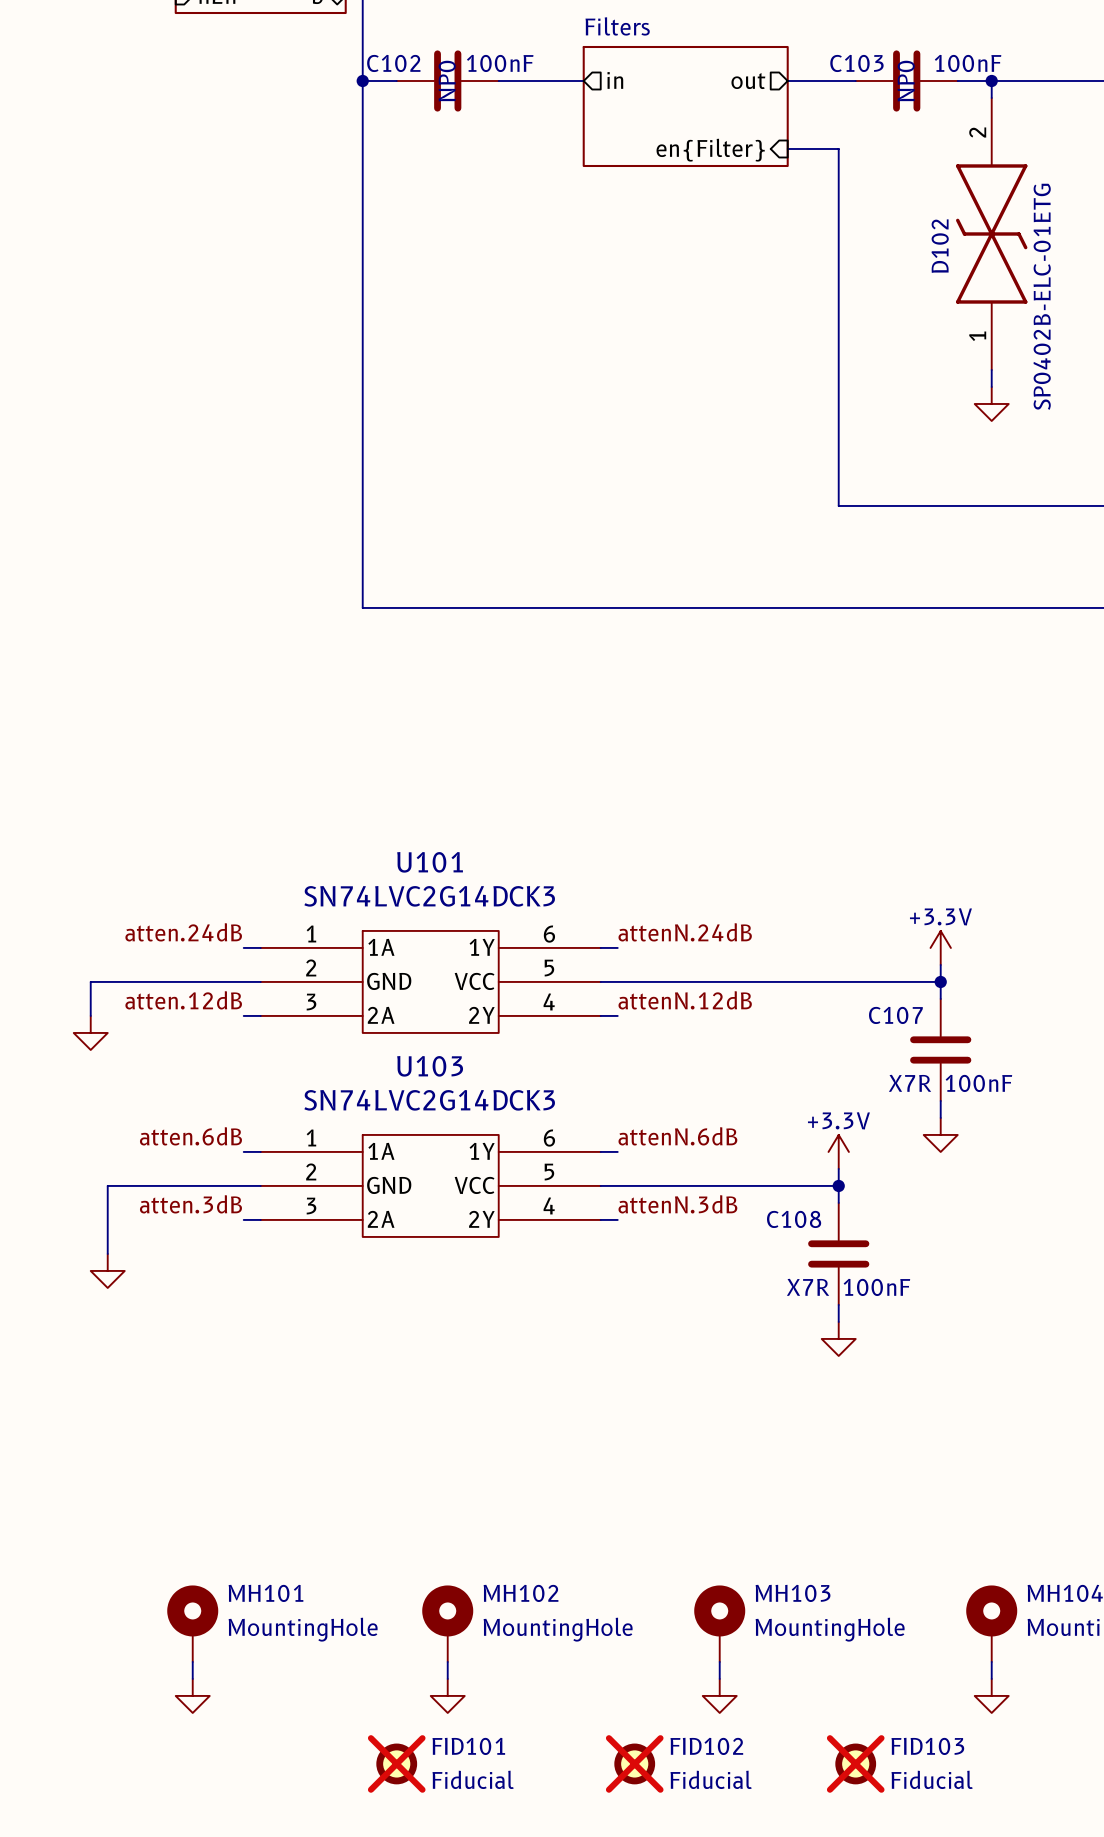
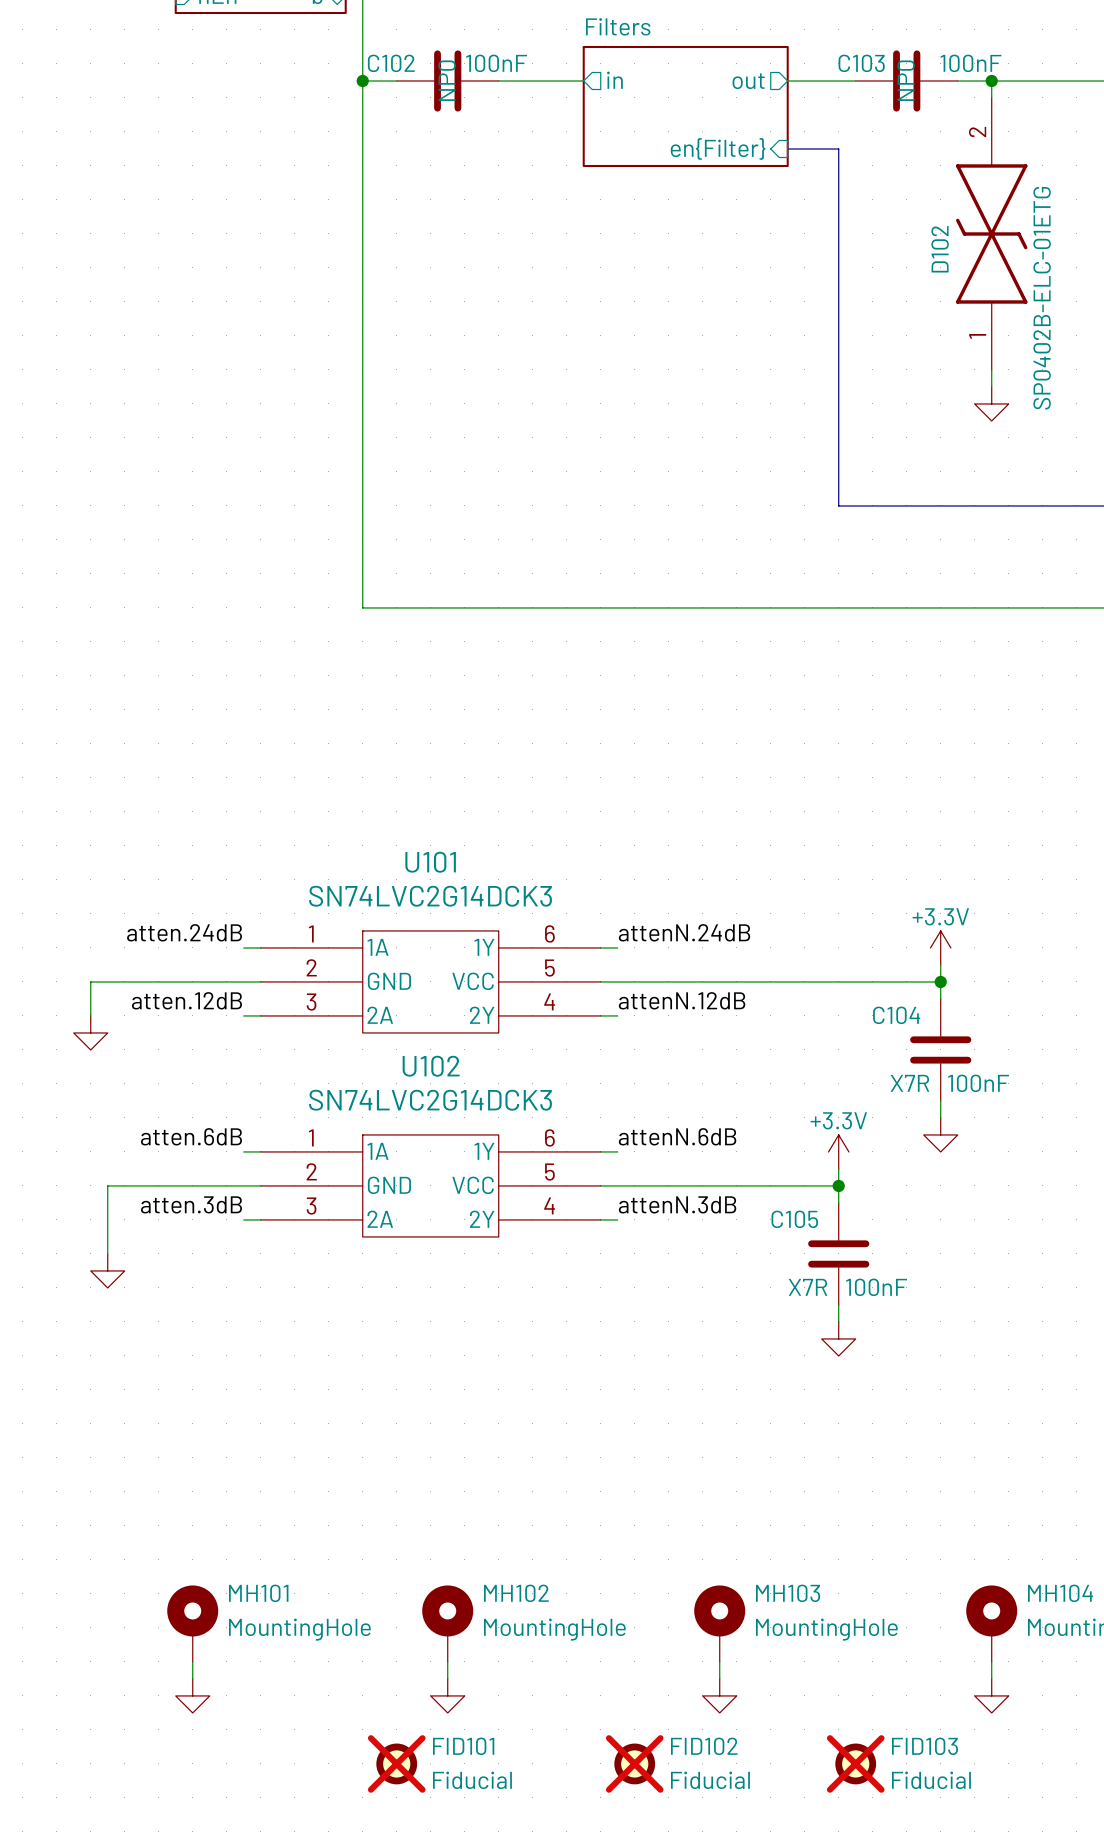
C107 name: C107 (895, 1015) -> C104 (896, 1015)
U103 name: U103 (430, 1066) -> U102 (431, 1066)
C108 name: C108 (794, 1219) -> C105 (794, 1219)

